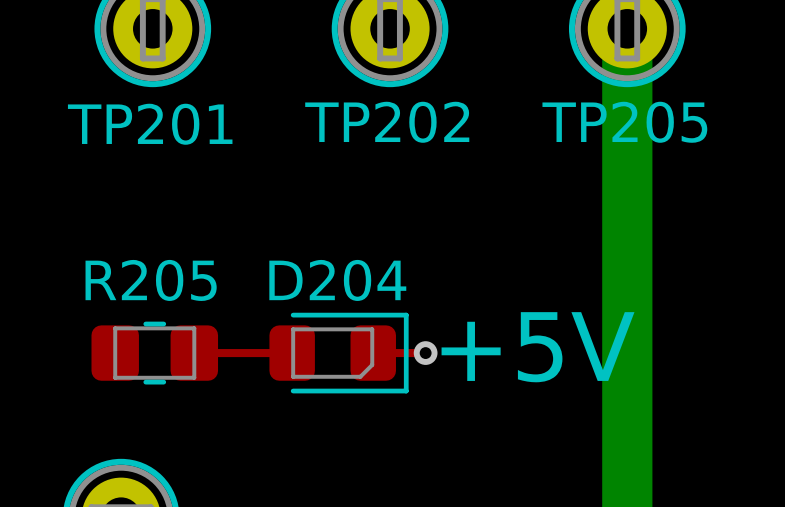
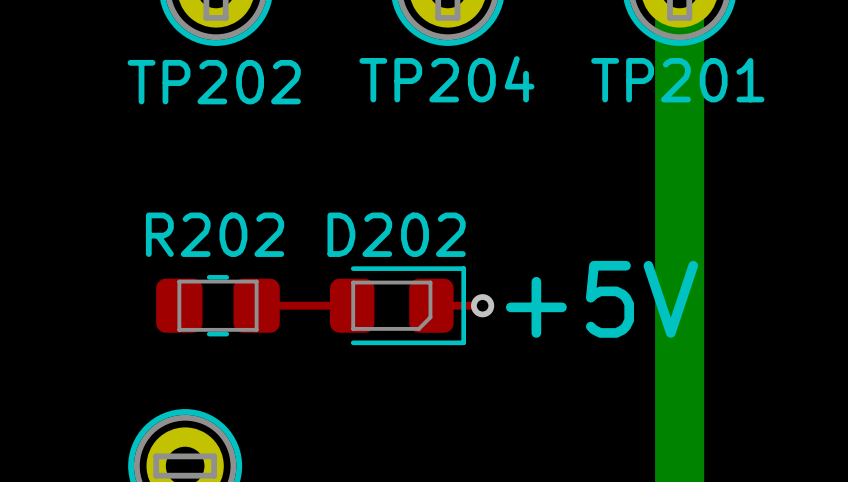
TP202 name: TP202 (387, 122) -> TP204 (446, 79)
TP205 name: TP205 (624, 122) -> TP201 (677, 80)
TP201 name: TP201 (150, 124) -> TP202 (214, 82)
R205 name: R205 (151, 280) -> R202 (215, 234)
D204 name: D204 (337, 280) -> D202 (396, 234)

